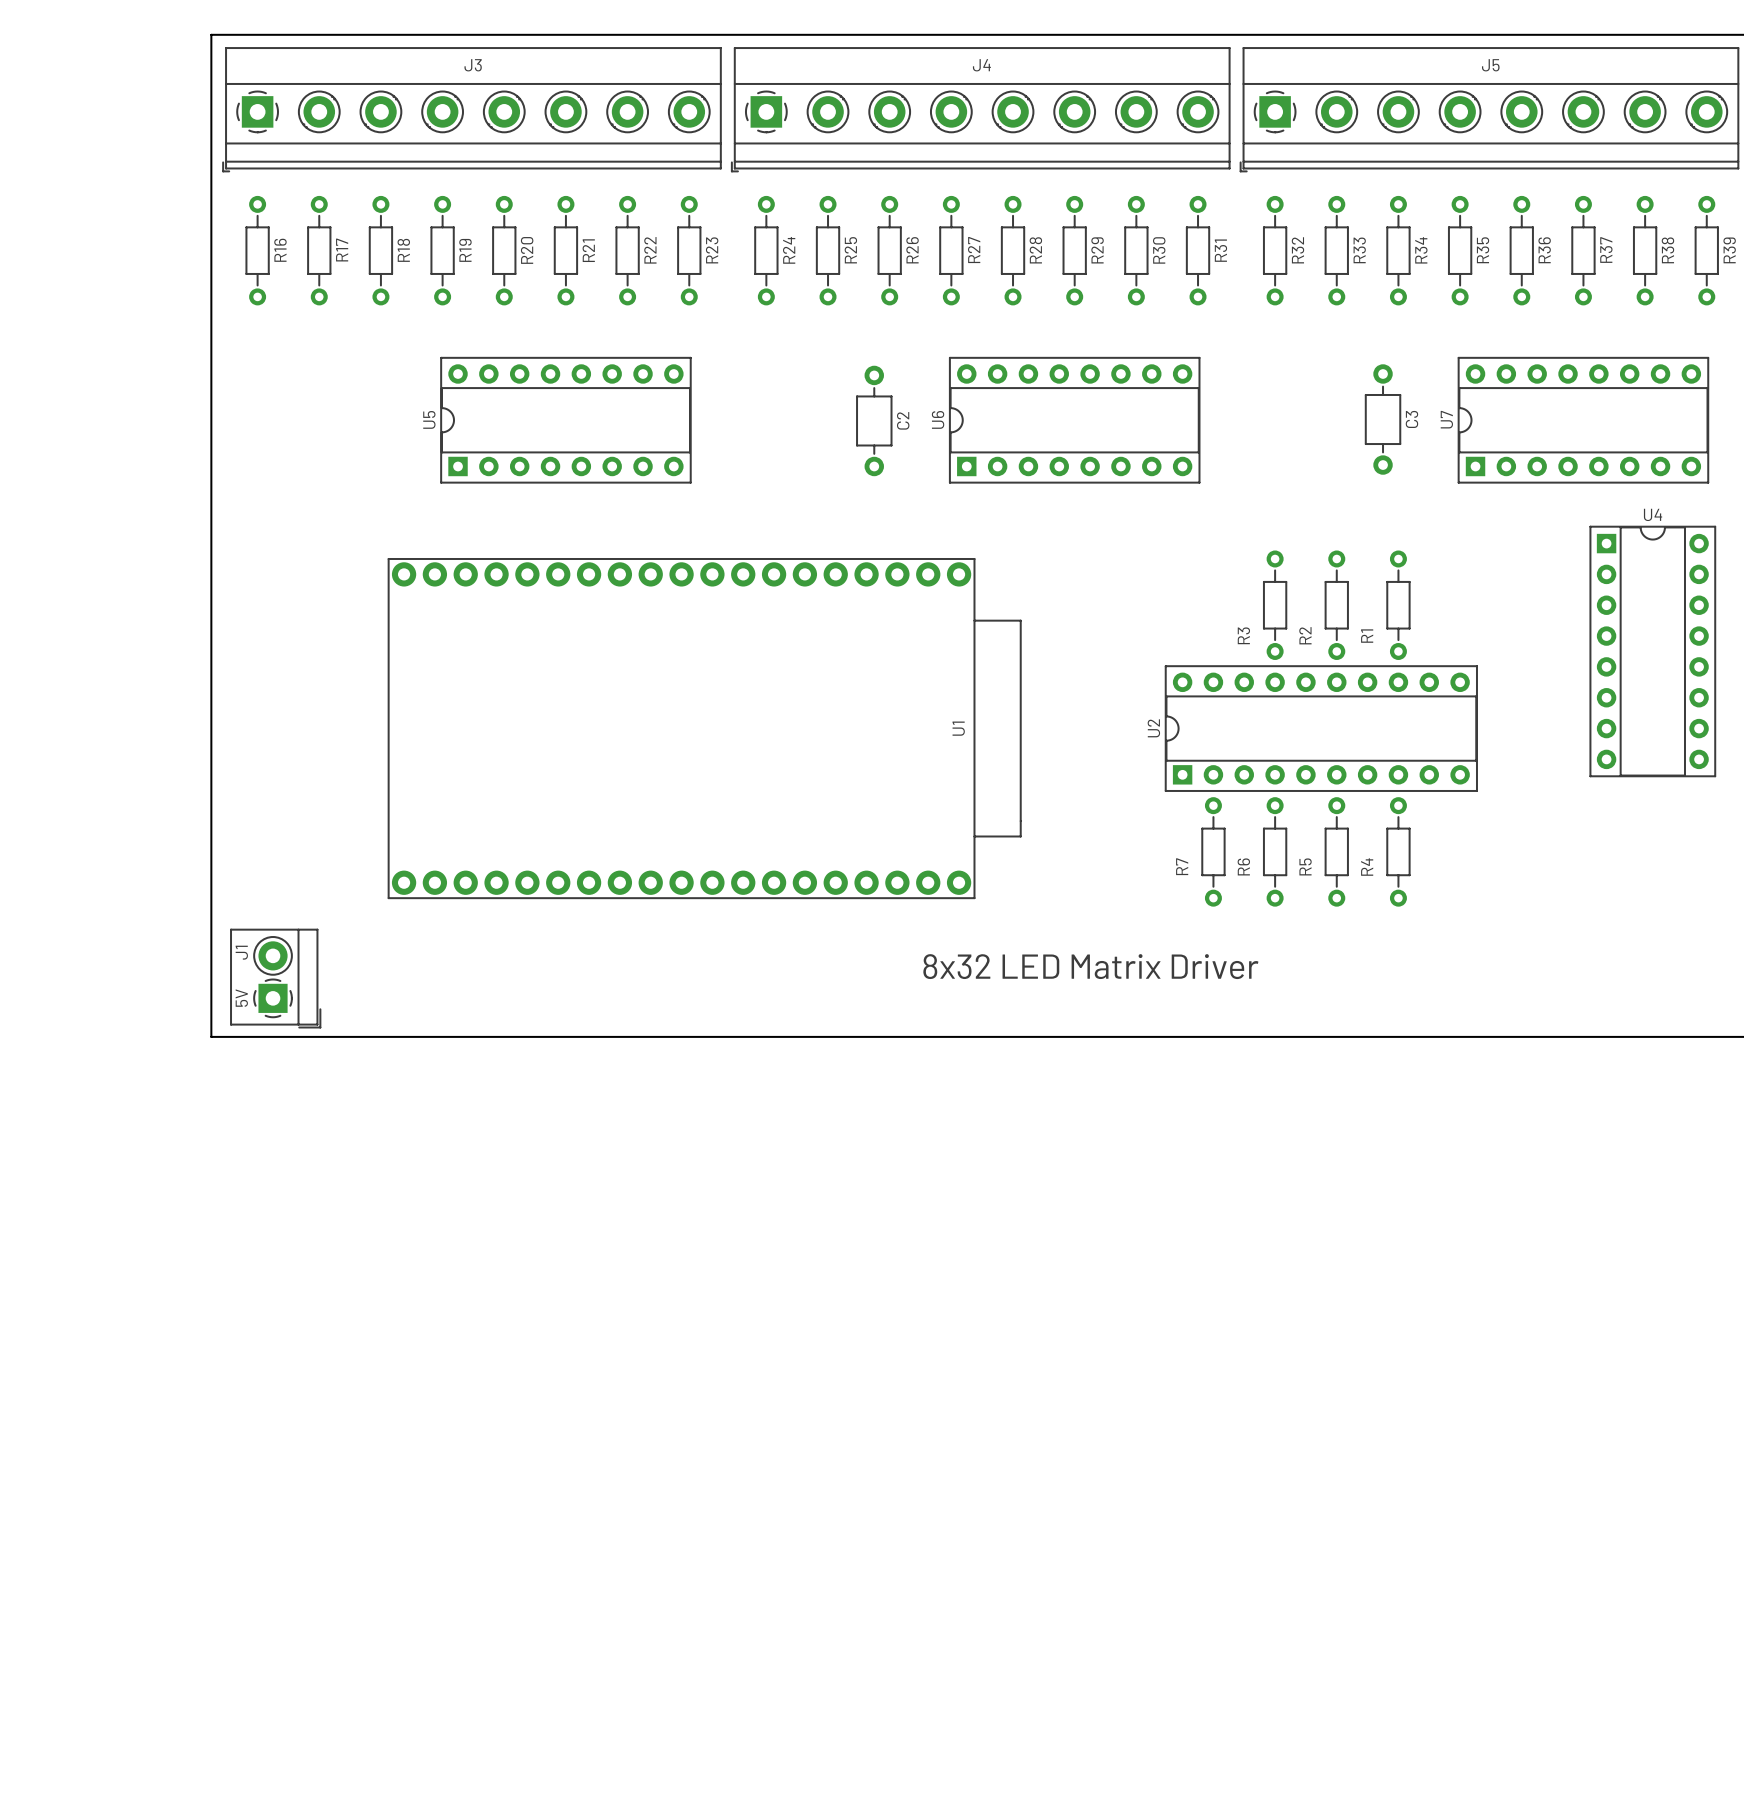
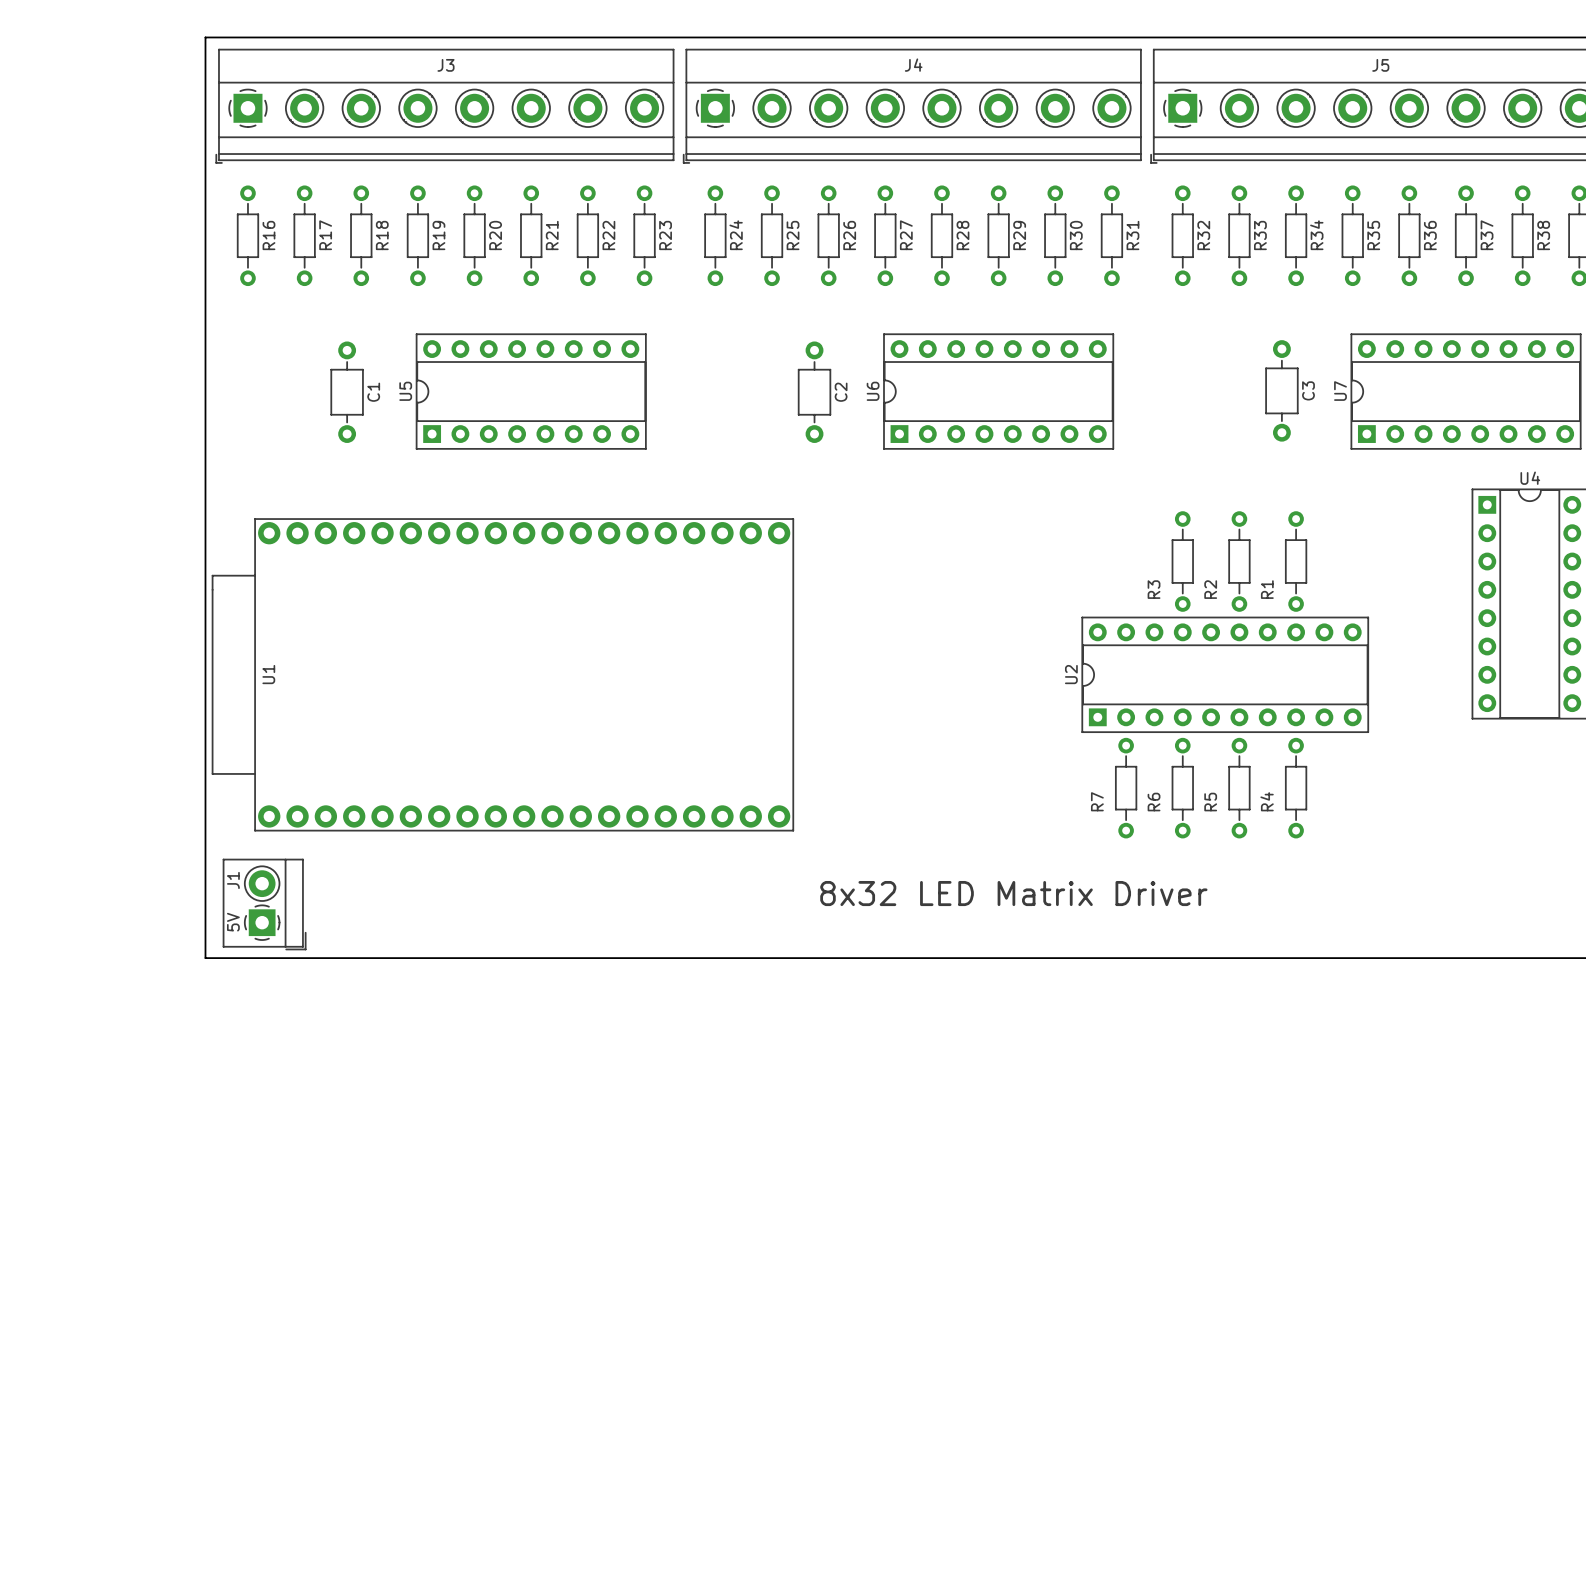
C1: none -> (347, 392)
U1 rotation: 0° (704, 728) -> 180° (502, 674)

